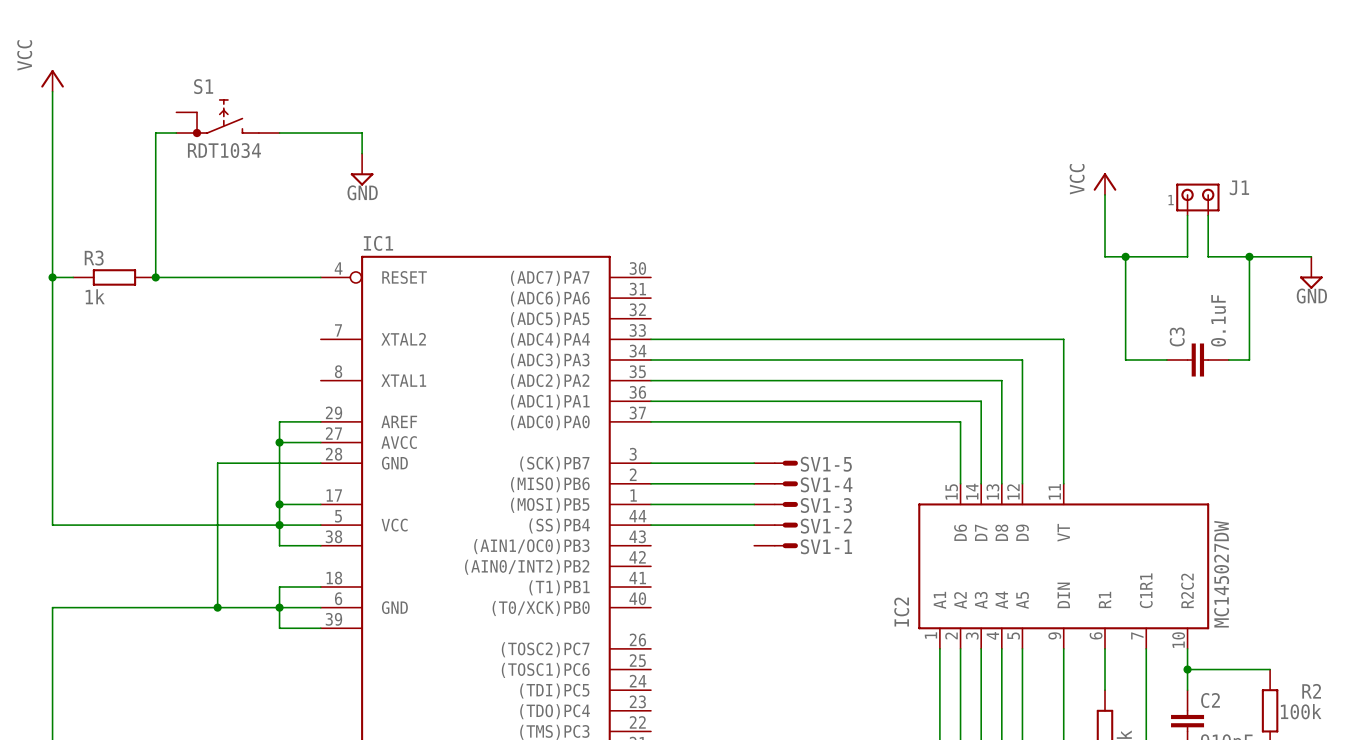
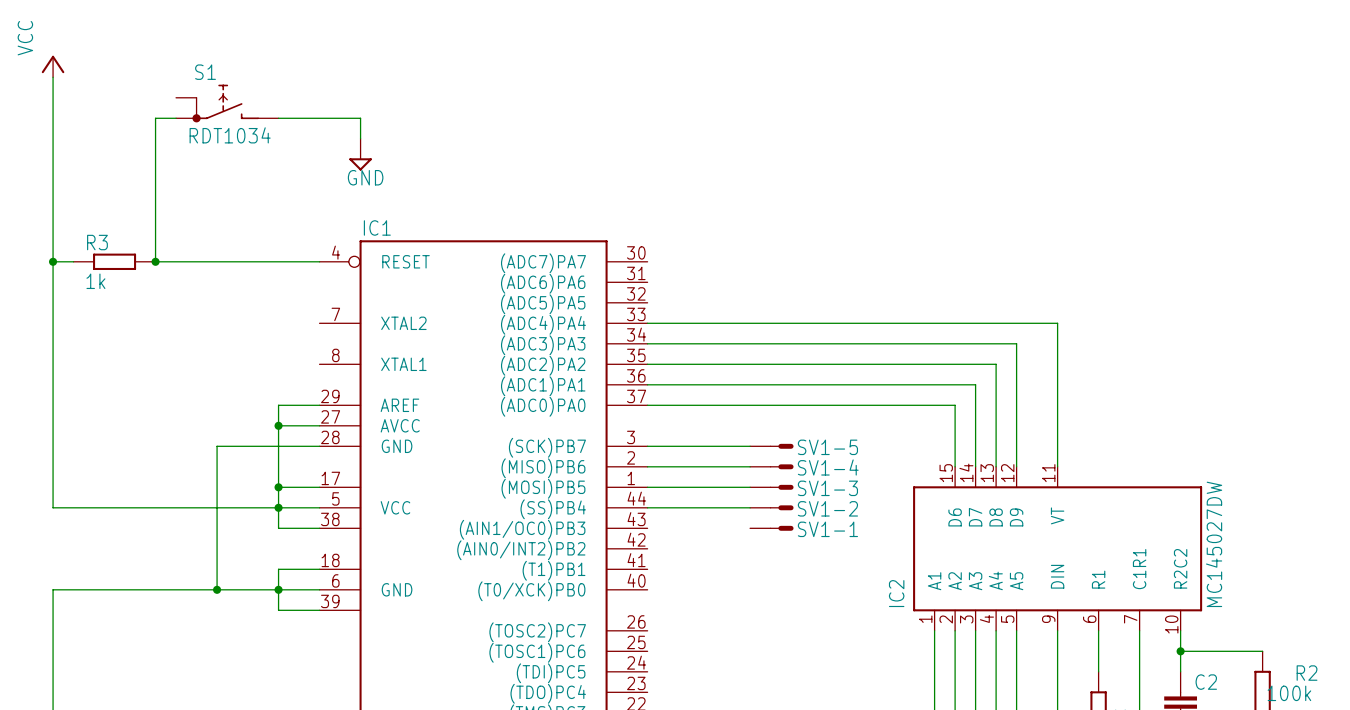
power symbol: VCC (1105, 184) -> none
wire: (1105, 194) (1105, 256) (1187, 256) (1187, 215) -> none
J1: (1197, 199) -> none
wire: (1208, 215) (1208, 256) (1311, 256) -> none
wire: (1125, 256) (1125, 360) (1166, 360) -> none
junction: (1125, 256) -> none
wire: (1249, 256) (1249, 360) (1228, 360) -> none
junction: (1249, 256) -> none
power symbol: GND (1311, 272) -> none
C3: 0.1uF (1197, 360) -> none

